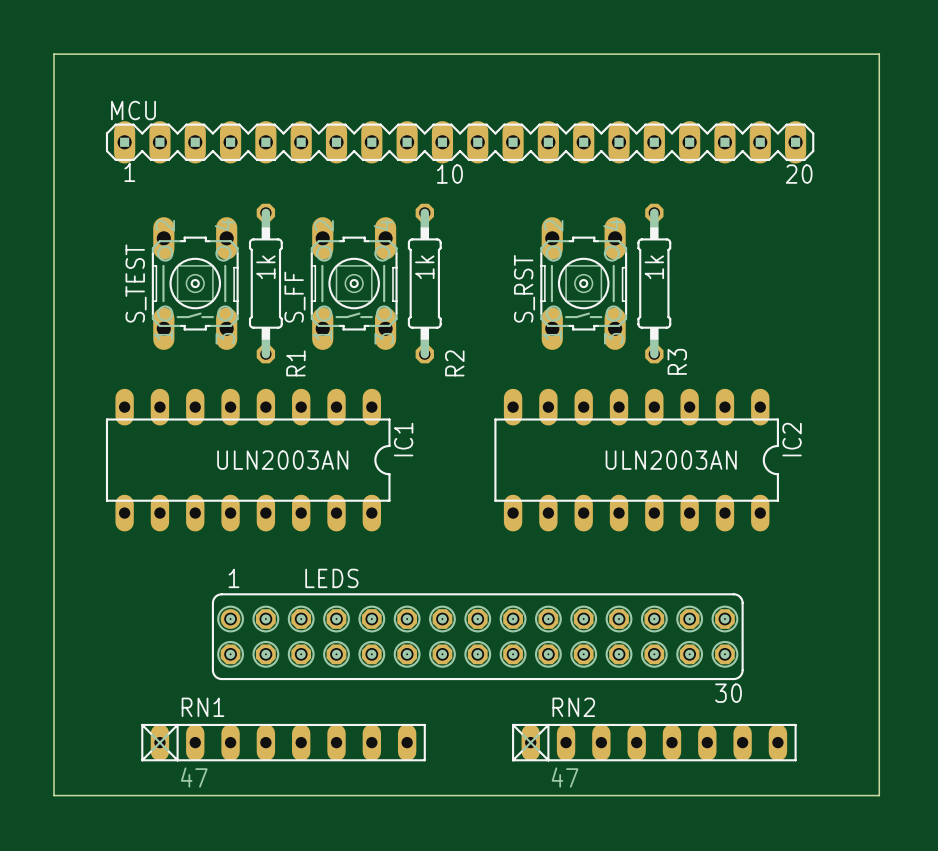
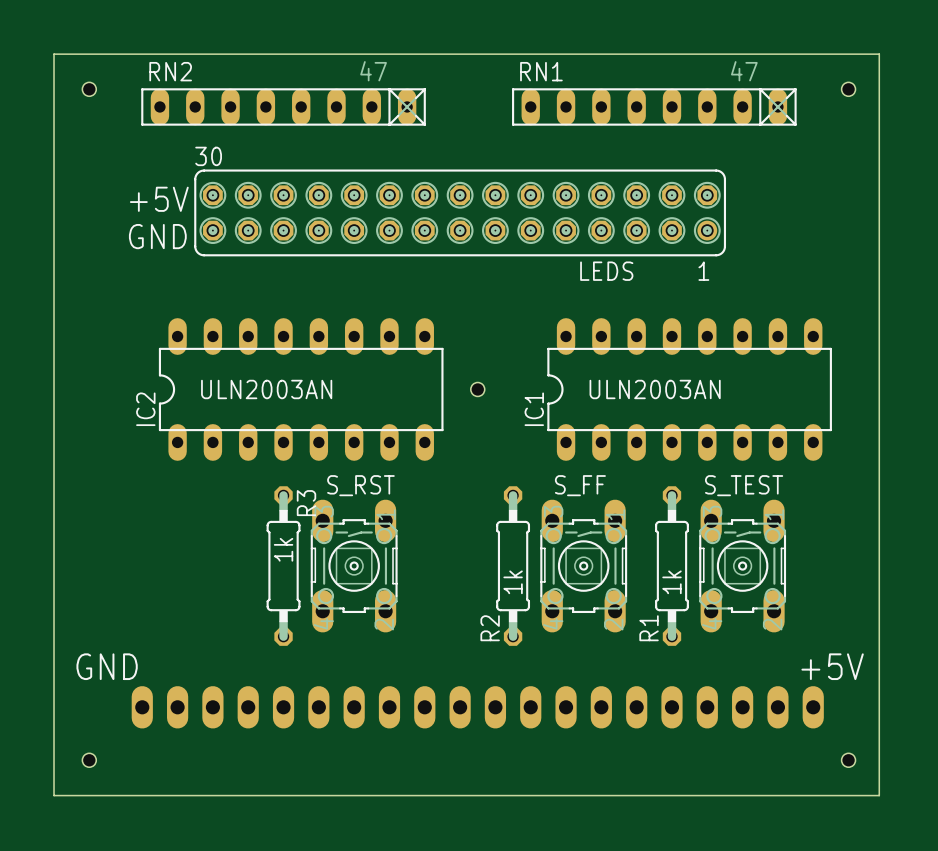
hole: none -> (89, 89)
hole: none -> (848, 89)
MCU: (460, 142) -> none
text: none -> +5V (159, 199)
LEDS: none -> (460, 212)
text: none -> GND (157, 236)
R1 value position: 1k (265, 267) -> 1k (671, 582)
R2 value position: 1k (424, 267) -> 1k (513, 582)
S_TEST: (195, 283) -> none
R1 position: (265, 283) -> (671, 566)
S_FF: (354, 283) -> none
R2 position: (424, 283) -> (513, 566)
S_RST: (583, 283) -> none
R3 position: (654, 283) -> (283, 566)
R3 name position: R3 (677, 361) -> R3 (306, 503)
R1 name position: R1 (295, 363) -> R1 (649, 628)
R2 name position: R2 (454, 363) -> R2 (490, 628)
hole: none -> (477, 389)
IC1 rotation: 0° (248, 460) -> 180° (689, 389)
IC1 position: (248, 460) -> (689, 389)
IC2 rotation: 0° (636, 460) -> 180° (301, 389)
IC2 position: (636, 460) -> (301, 389)
S_RST: none -> (354, 566)
S_FF: none -> (583, 566)
S_TEST: none -> (742, 566)
LEDS: (477, 636) -> none
text: none -> GND (107, 666)
text: none -> +5V (832, 666)
RN1 name position: RN1 (202, 707) -> RN1 (541, 71)
part: none -> (477, 707)
RN2 name position: RN2 (573, 707) -> RN2 (170, 71)
RN1 rotation: 0° (283, 742) -> 180° (654, 106)
RN1 position: (283, 742) -> (654, 106)
RN2 rotation: 0° (654, 742) -> 180° (283, 106)
RN2 position: (654, 742) -> (283, 106)
hole: none -> (89, 760)
hole: none -> (848, 760)

